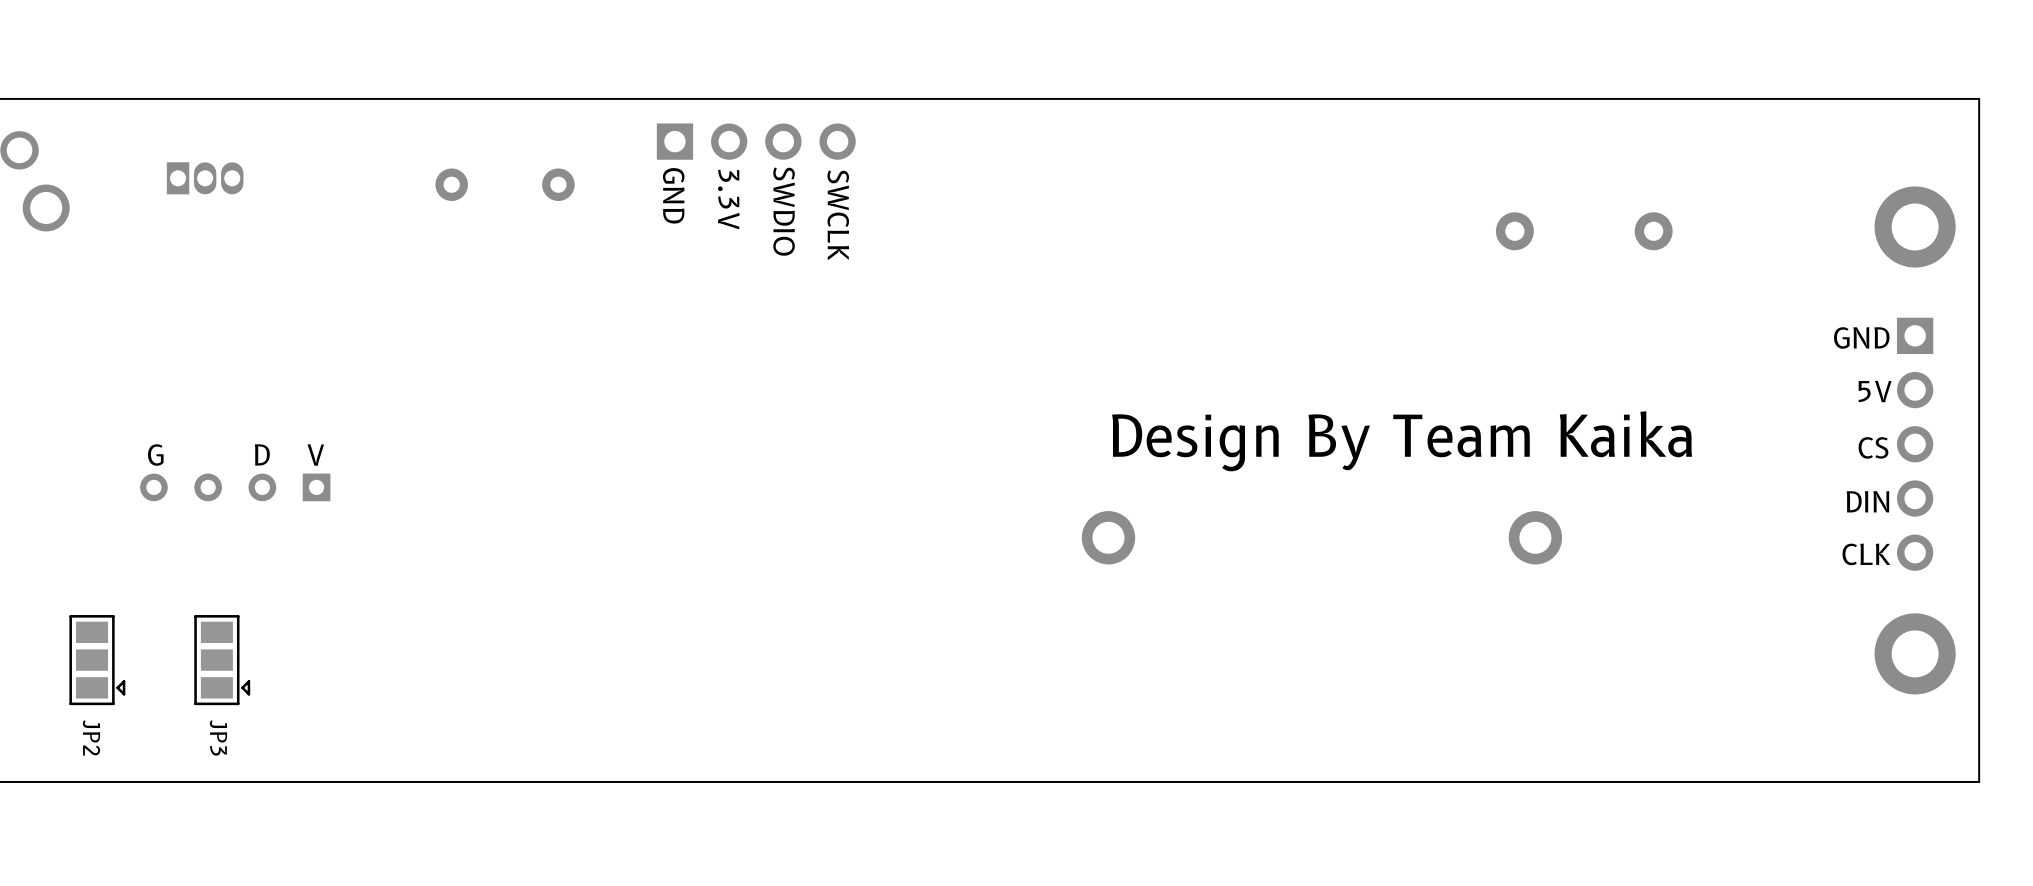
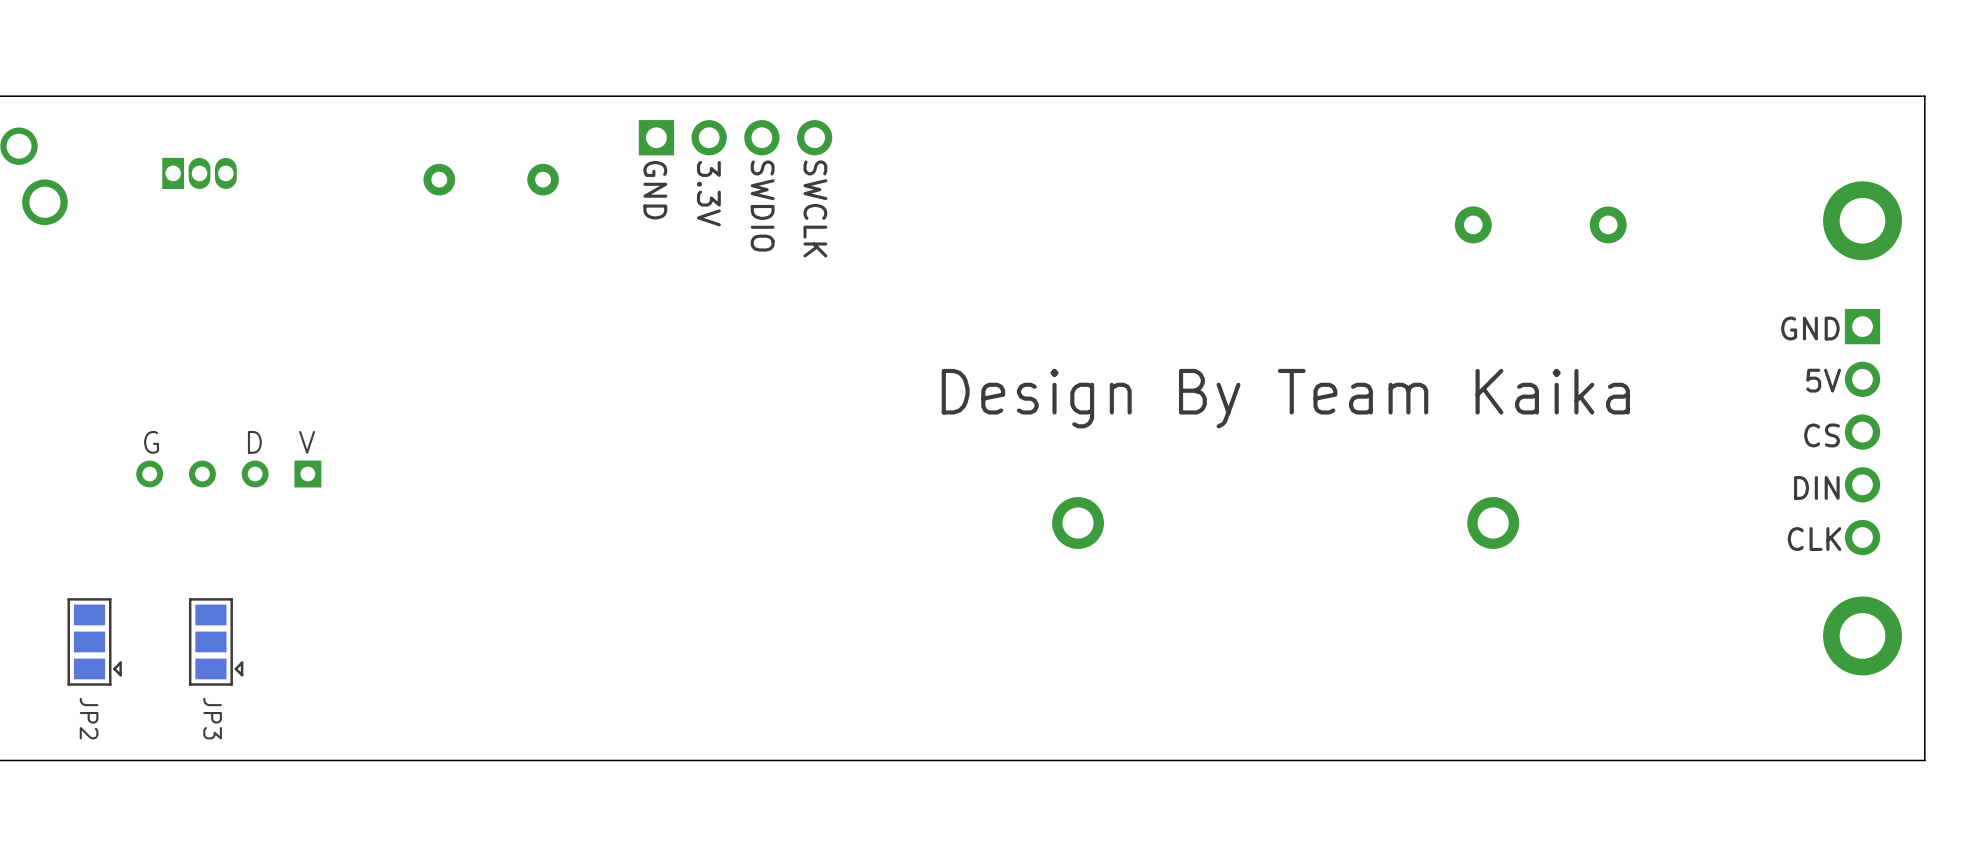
text position: Design By Team Kaika (1402, 441) -> Design By Team Kaika (1285, 398)

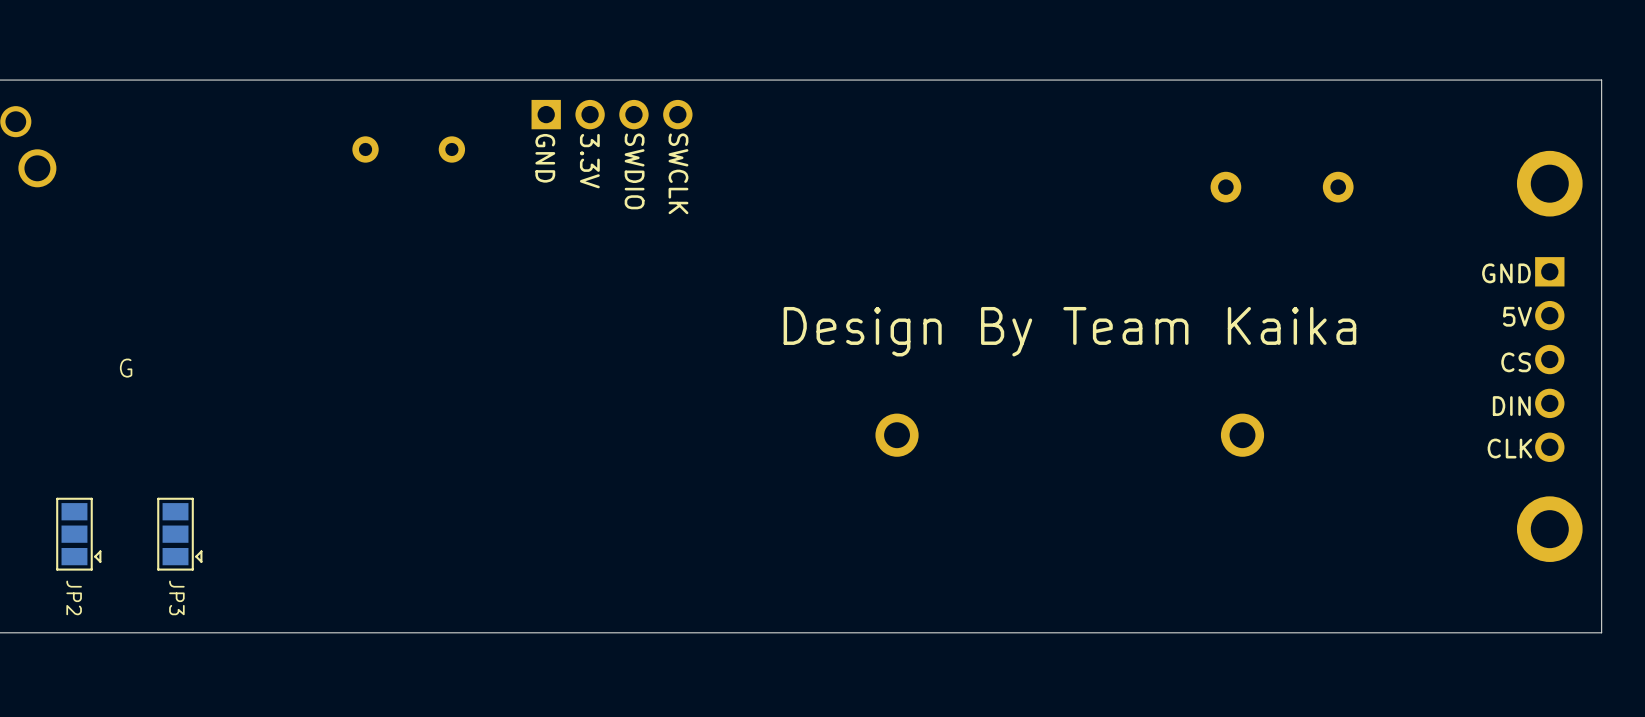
part: (199, 173) -> none
text: D (254, 442) -> none
text: V (307, 442) -> none
part: (228, 474) -> none

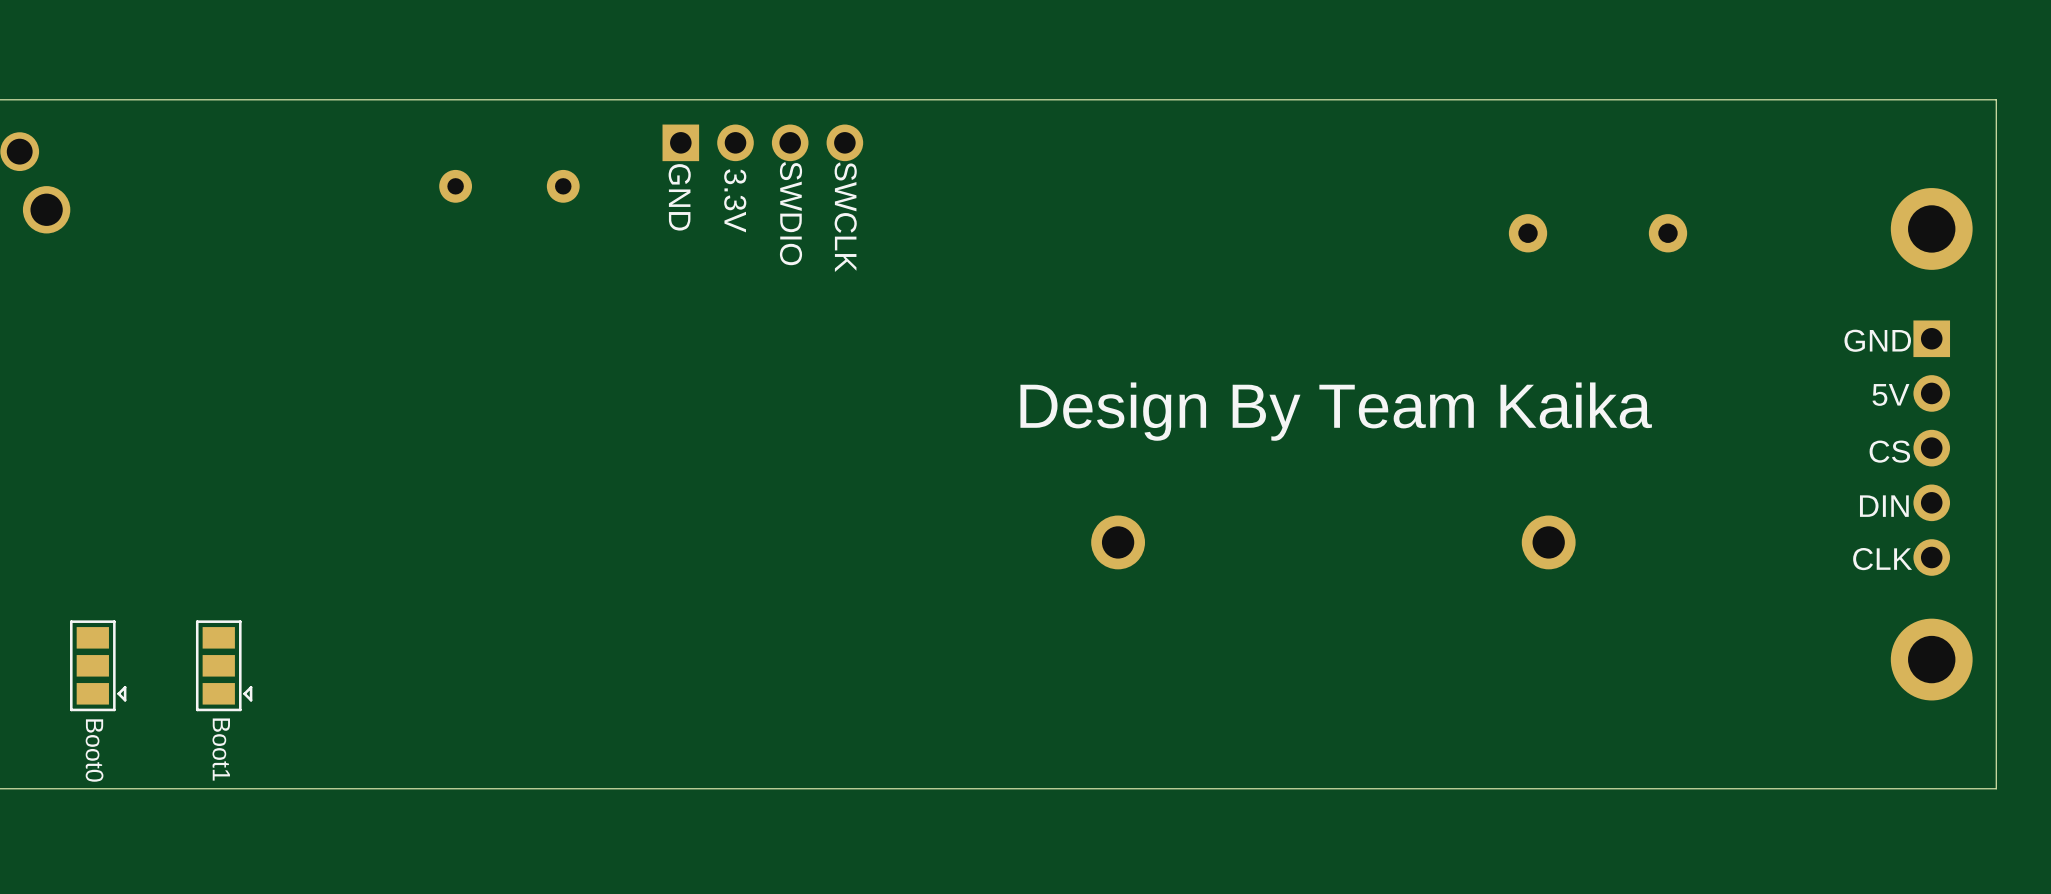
text: G (126, 368) -> none
JP2 name: JP2 (74, 597) -> Boot0 (94, 750)
JP3 name: JP3 (176, 597) -> Boot1 (221, 749)

